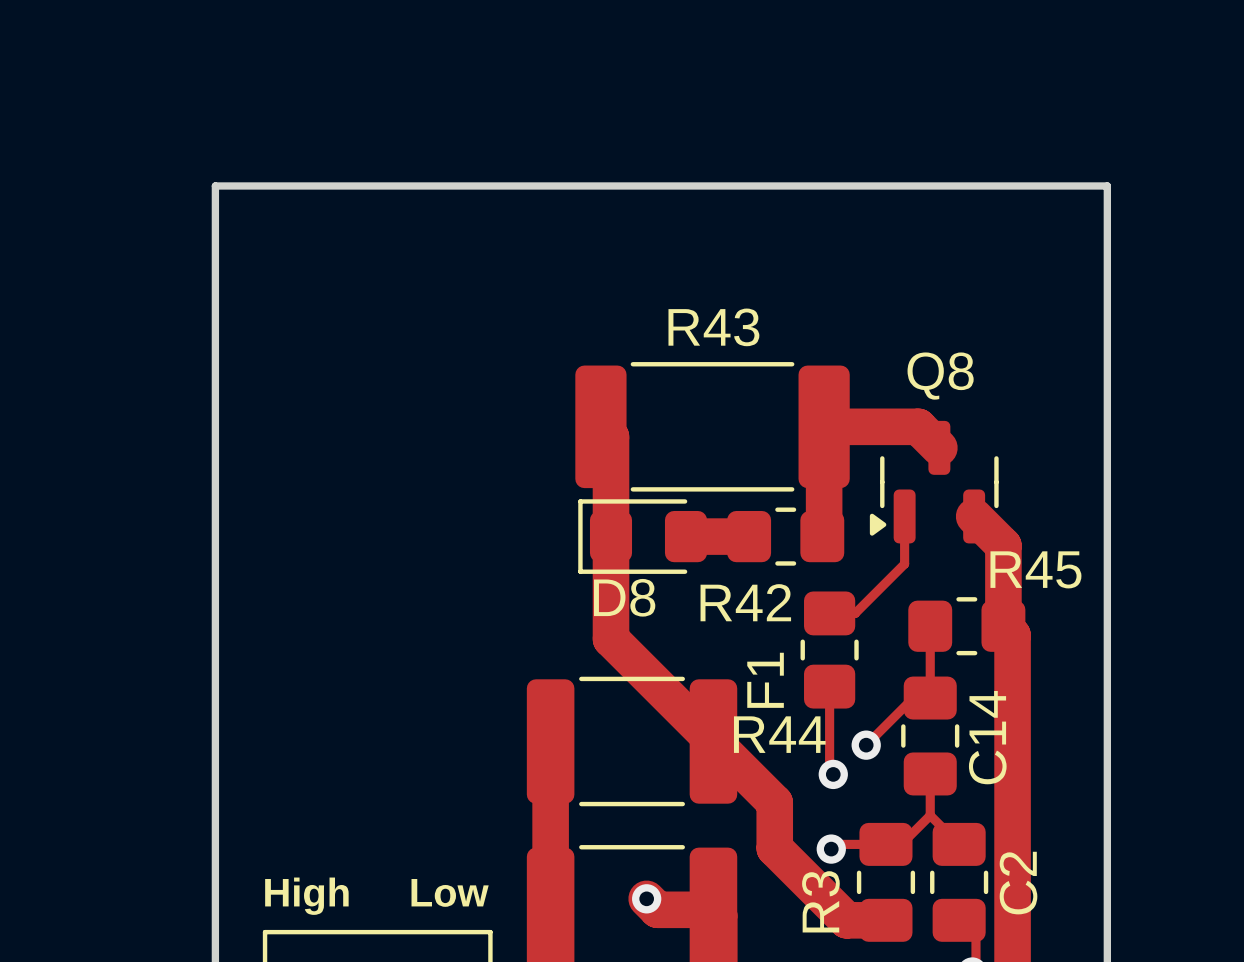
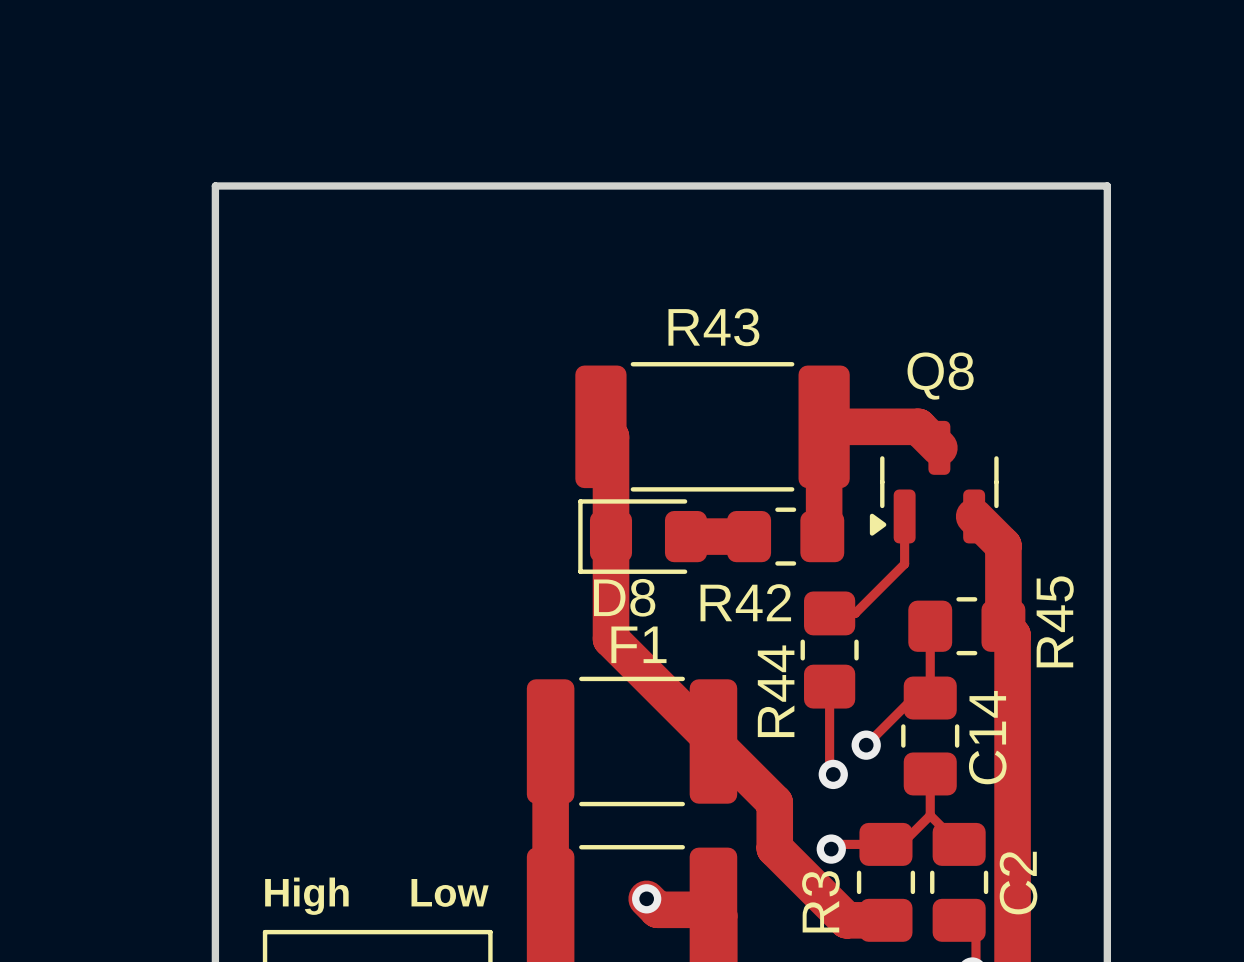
R45 name rotation: 0° (1035, 569) -> 90° counterclockwise (1055, 621)
F1 name rotation: 0° (765, 680) -> 90° clockwise (638, 644)
F1 name position: F1 (765, 680) -> F1 (638, 644)
R44 name rotation: 0° (779, 734) -> 90° counterclockwise (776, 691)

